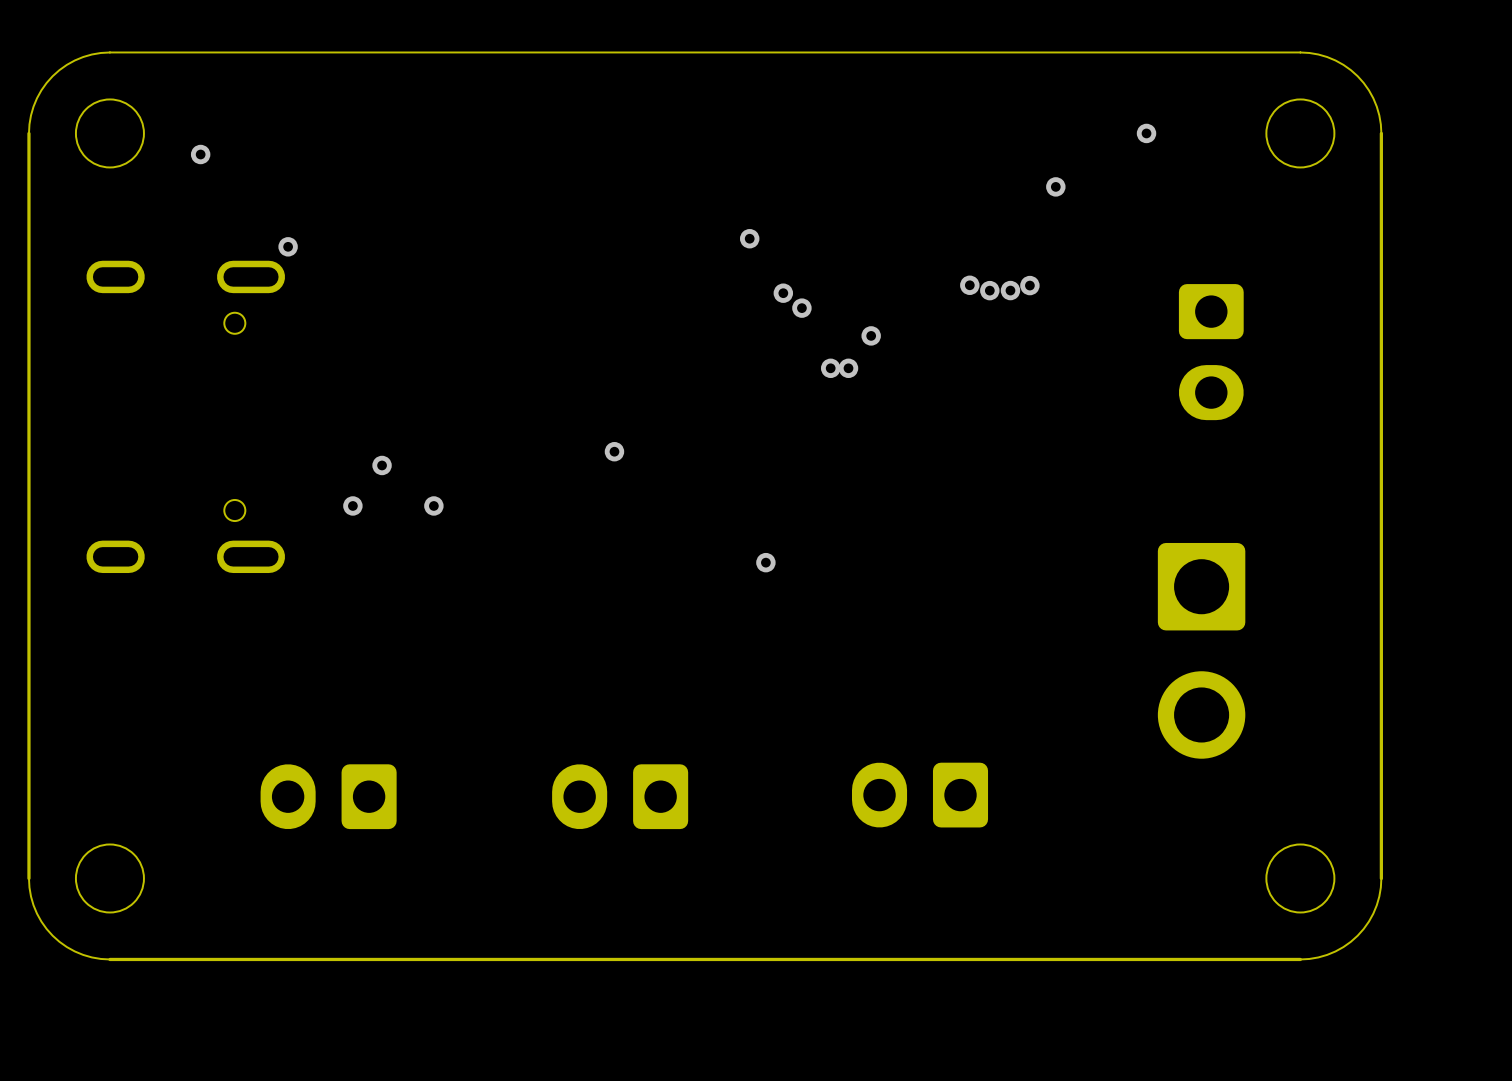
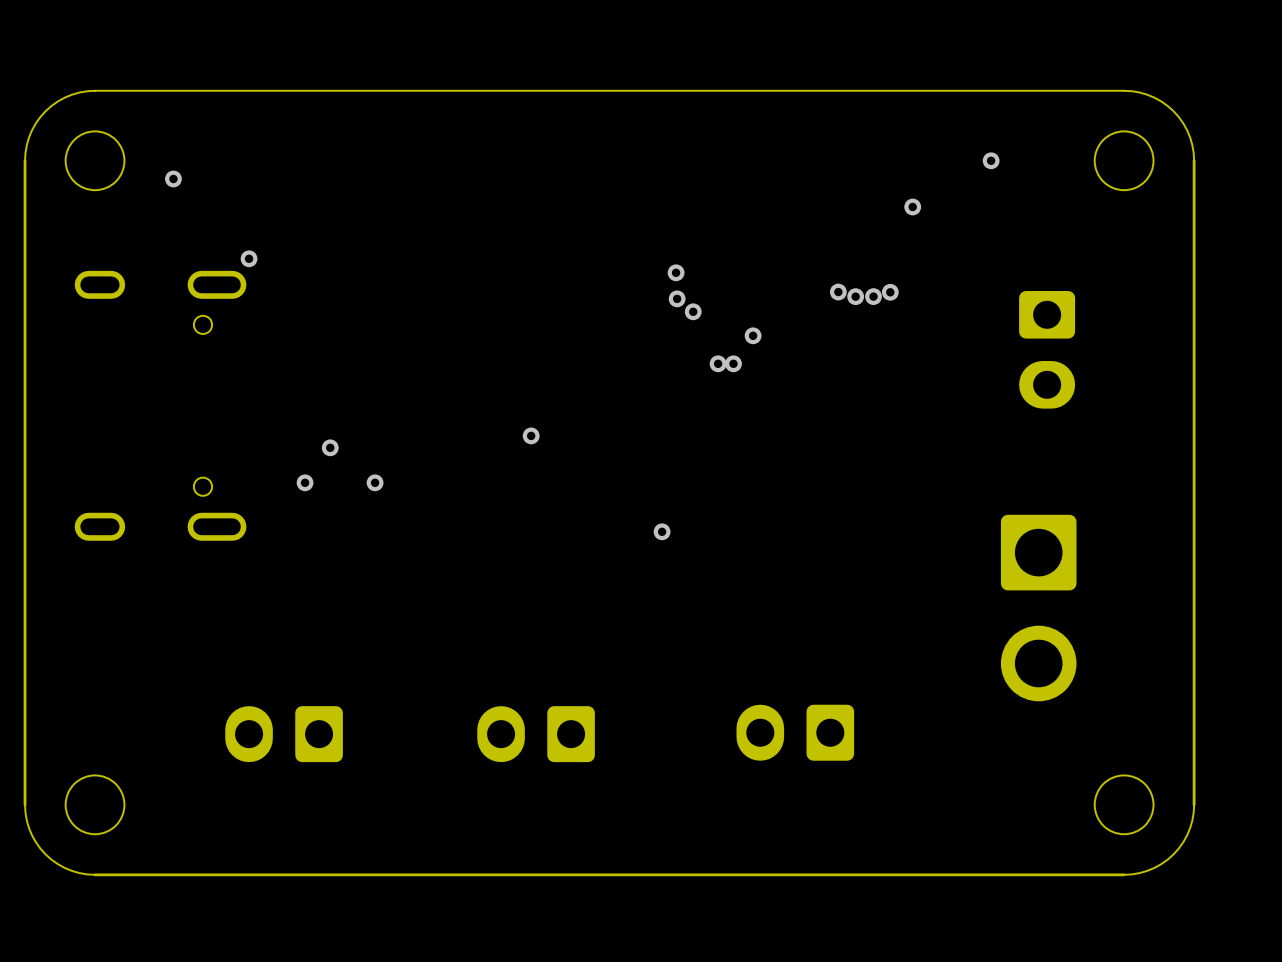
via position: (749, 238) -> (676, 272)

